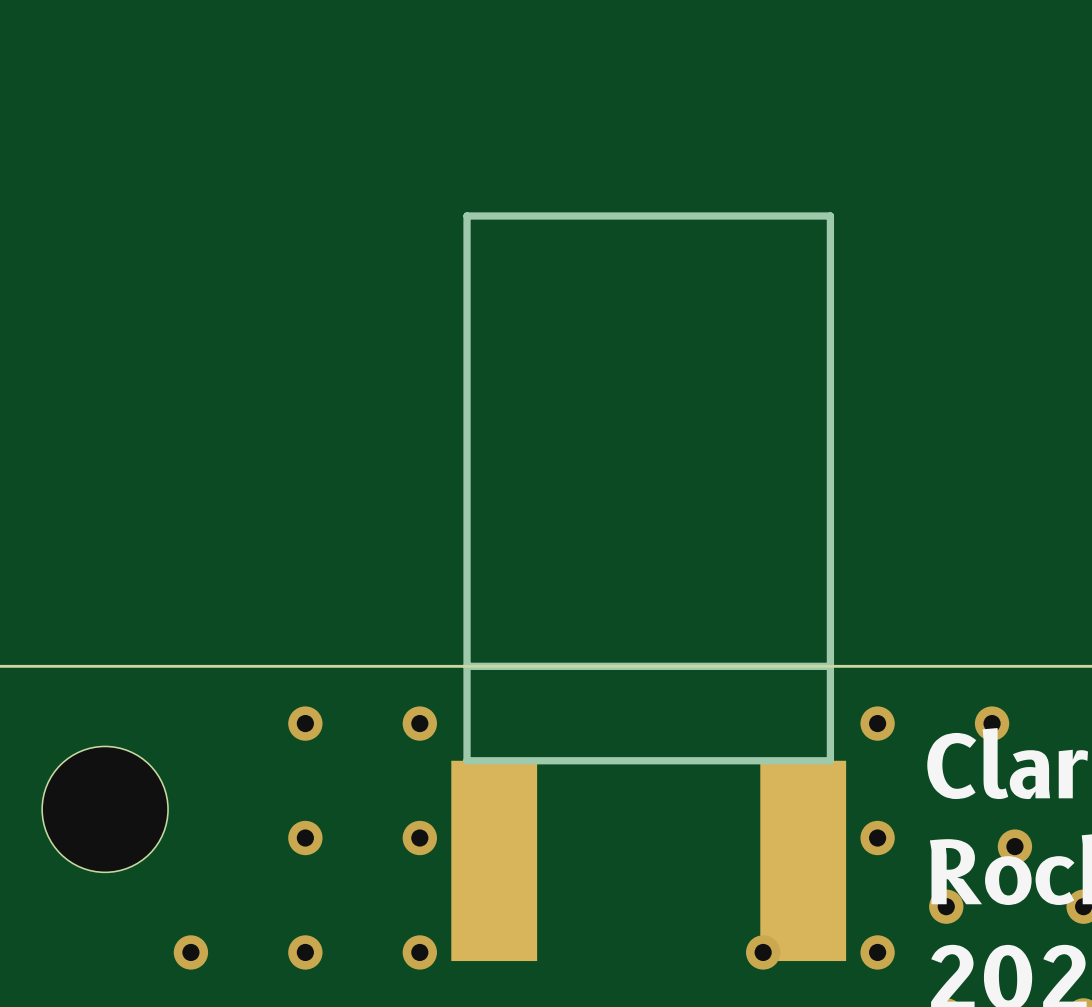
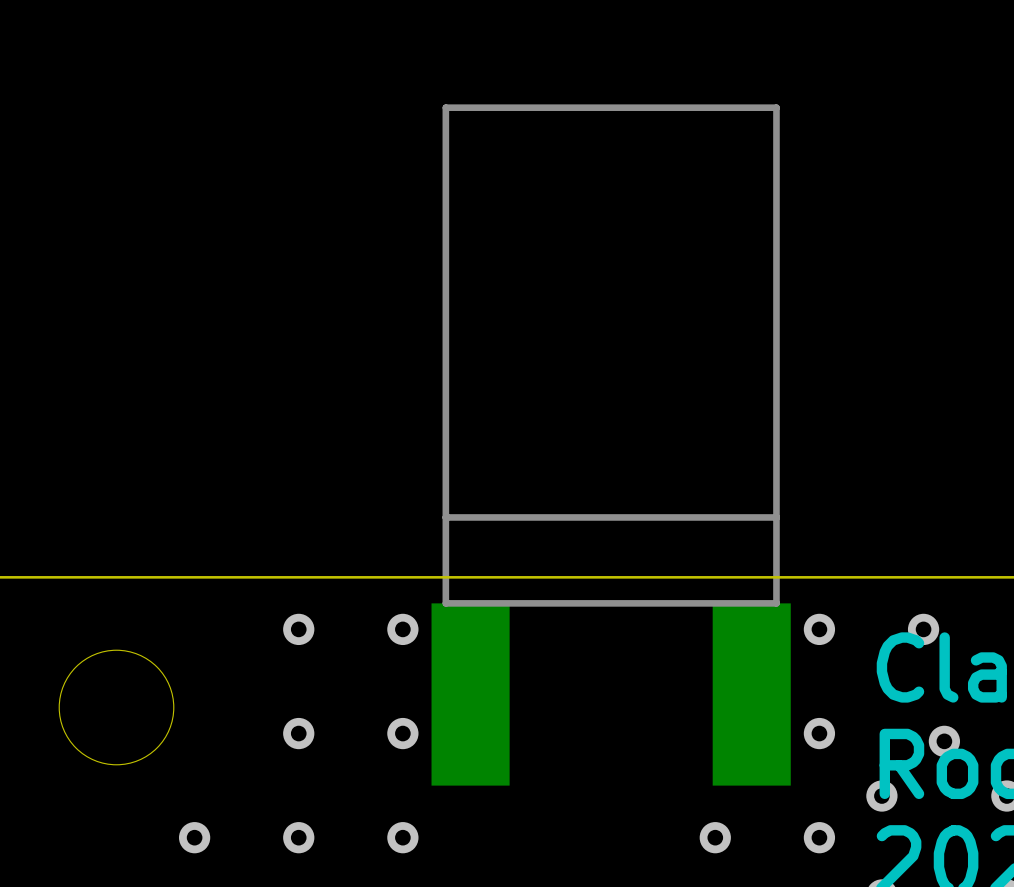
part position: (648, 586) -> (611, 444)

